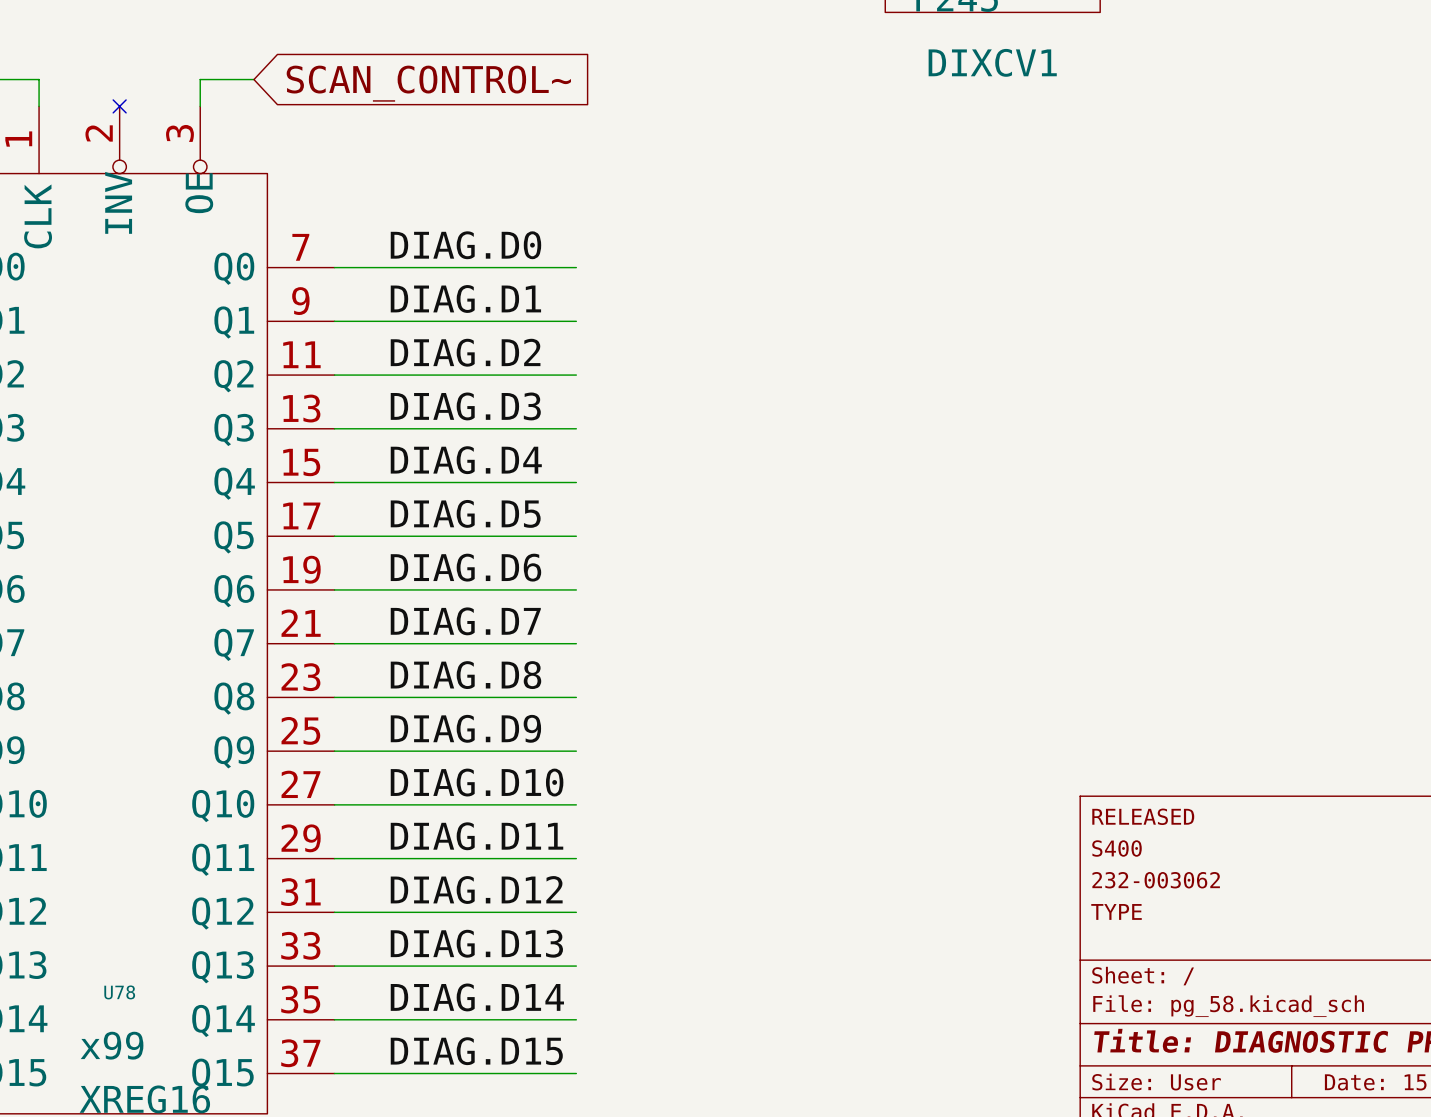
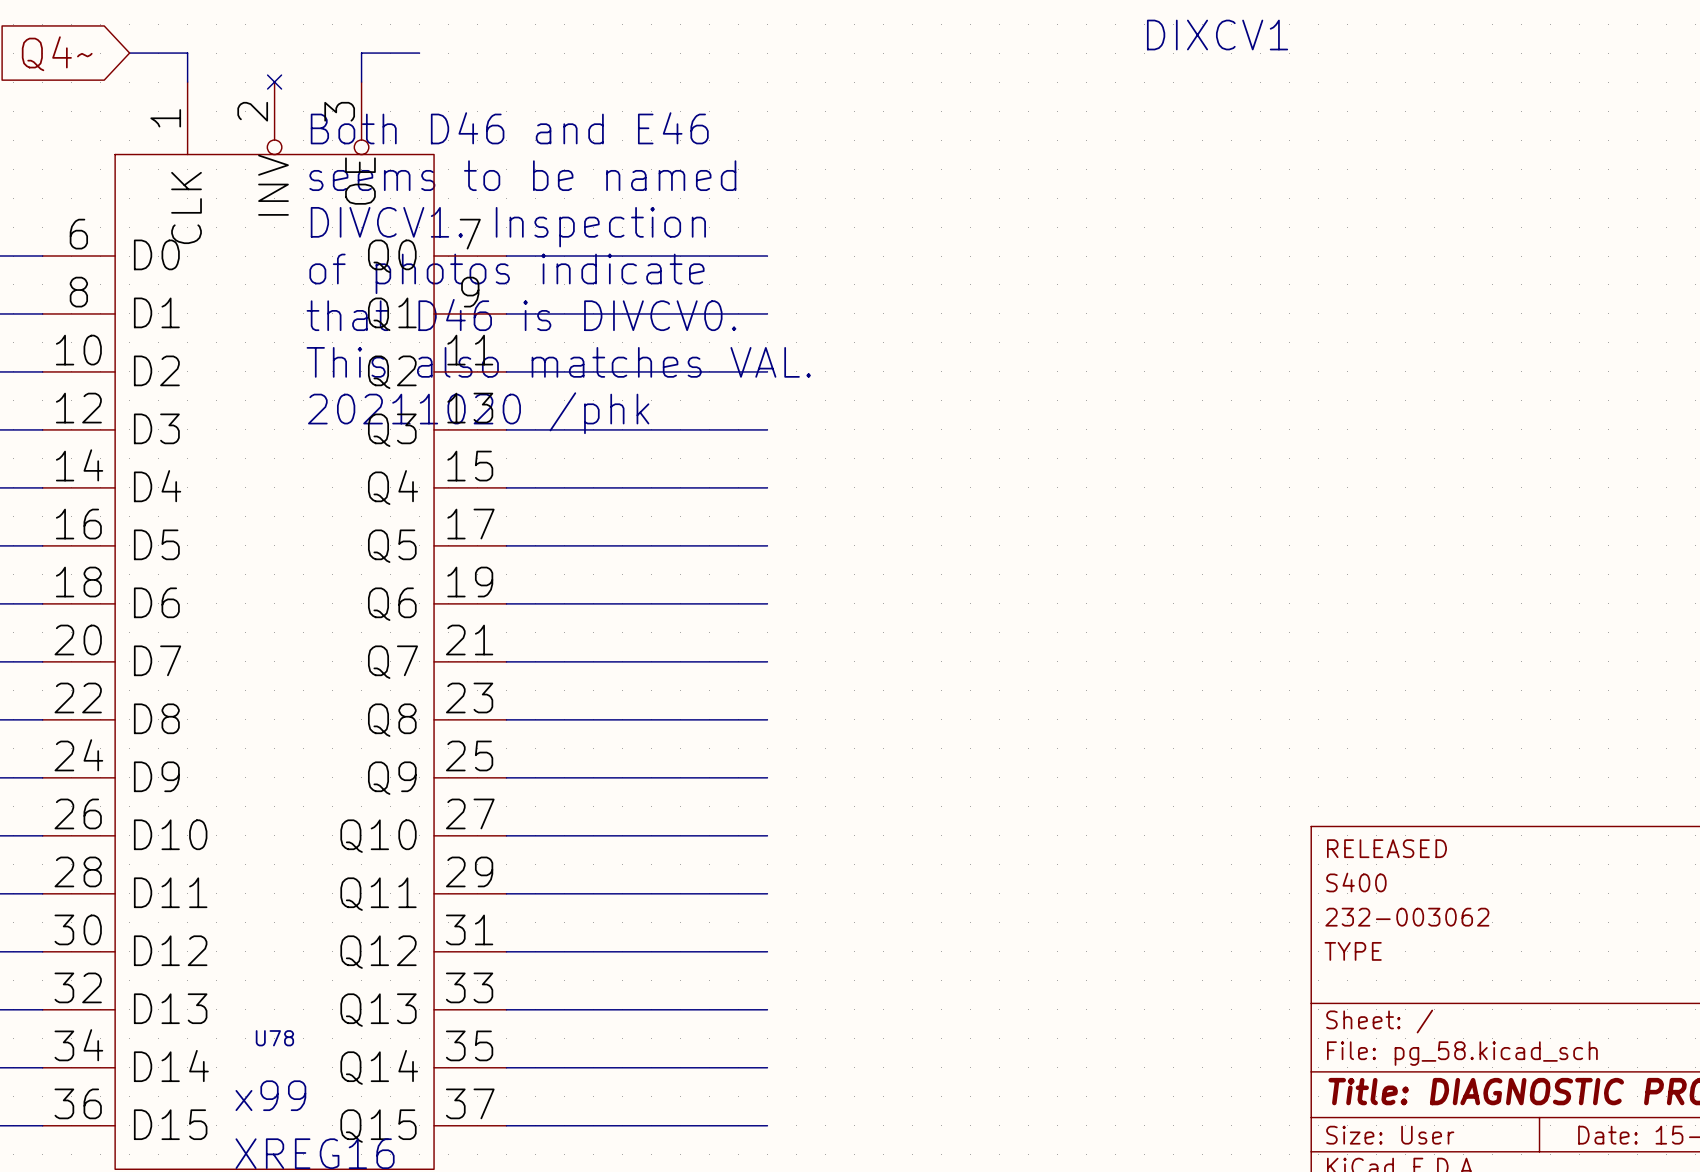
global label: SCAN_CONTROL~ (428, 83) -> none
text: none -> Both D46 and E46 (509, 128)
text: none -> seems to be named (522, 175)
text: none -> DIVCV1. Inspection (508, 227)
label: DIAG.D0 (465, 245) -> none
text: none -> of photos indicate (506, 273)
label: DIAG.D1 (465, 298) -> none
text: none -> that D46 is DIVCV0. (521, 315)
label: DIAG.D2 (465, 352) -> none
text: none -> This also matches VAL. (558, 362)
label: DIAG.D3 (465, 406) -> none
text: none -> 20211020 /phk (478, 413)
label: DIAG.D4 (466, 460) -> none
label: DIAG.D5 (465, 513) -> none
label: DIAG.D6 (465, 567) -> none
label: DIAG.D7 (465, 621) -> none
label: DIAG.D8 (465, 675) -> none
label: DIAG.D9 (465, 728) -> none
label: DIAG.D10 (477, 782) -> none
label: DIAG.D11 (477, 836) -> none
label: DIAG.D12 (476, 889) -> none
label: DIAG.D13 (476, 943) -> none
label: DIAG.D14 (477, 997) -> none
label: DIAG.D15 (476, 1051) -> none

